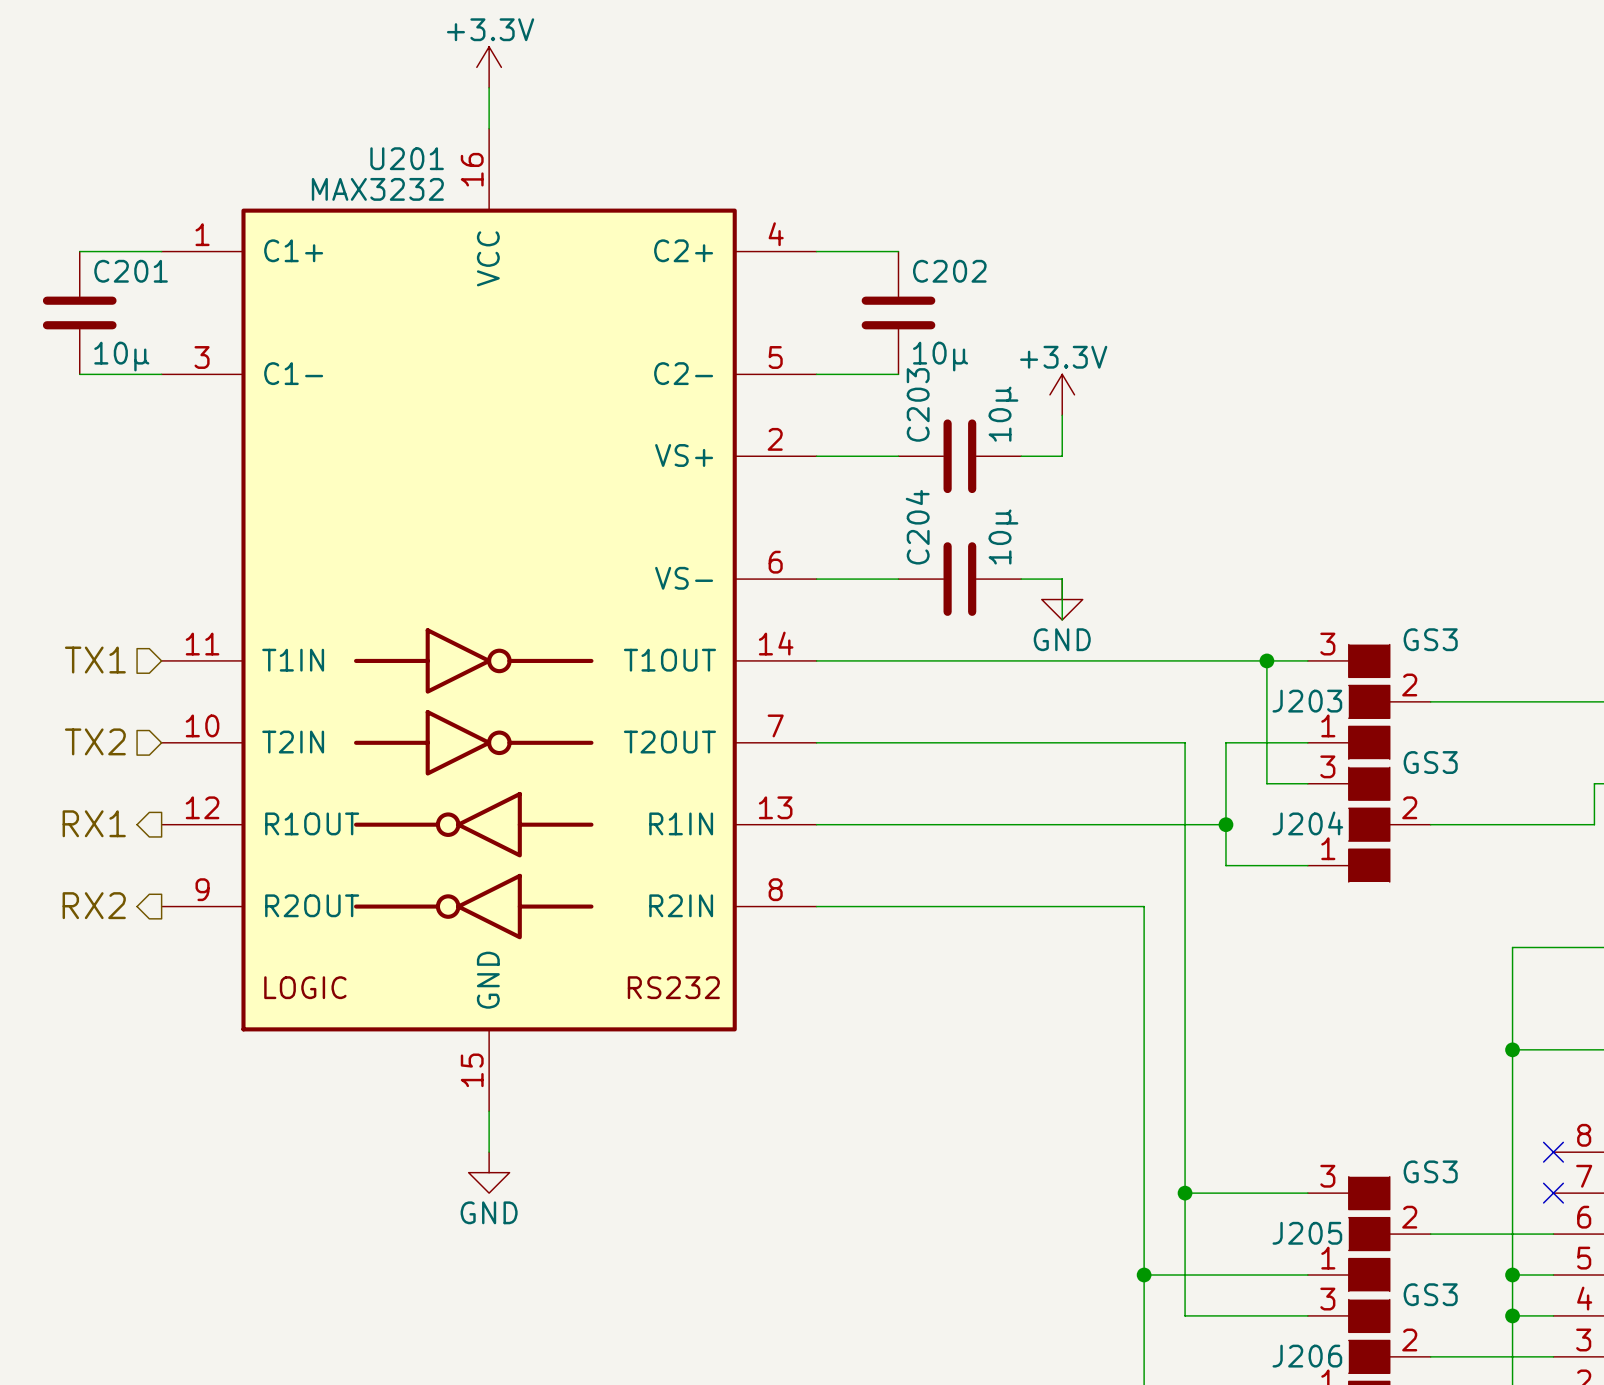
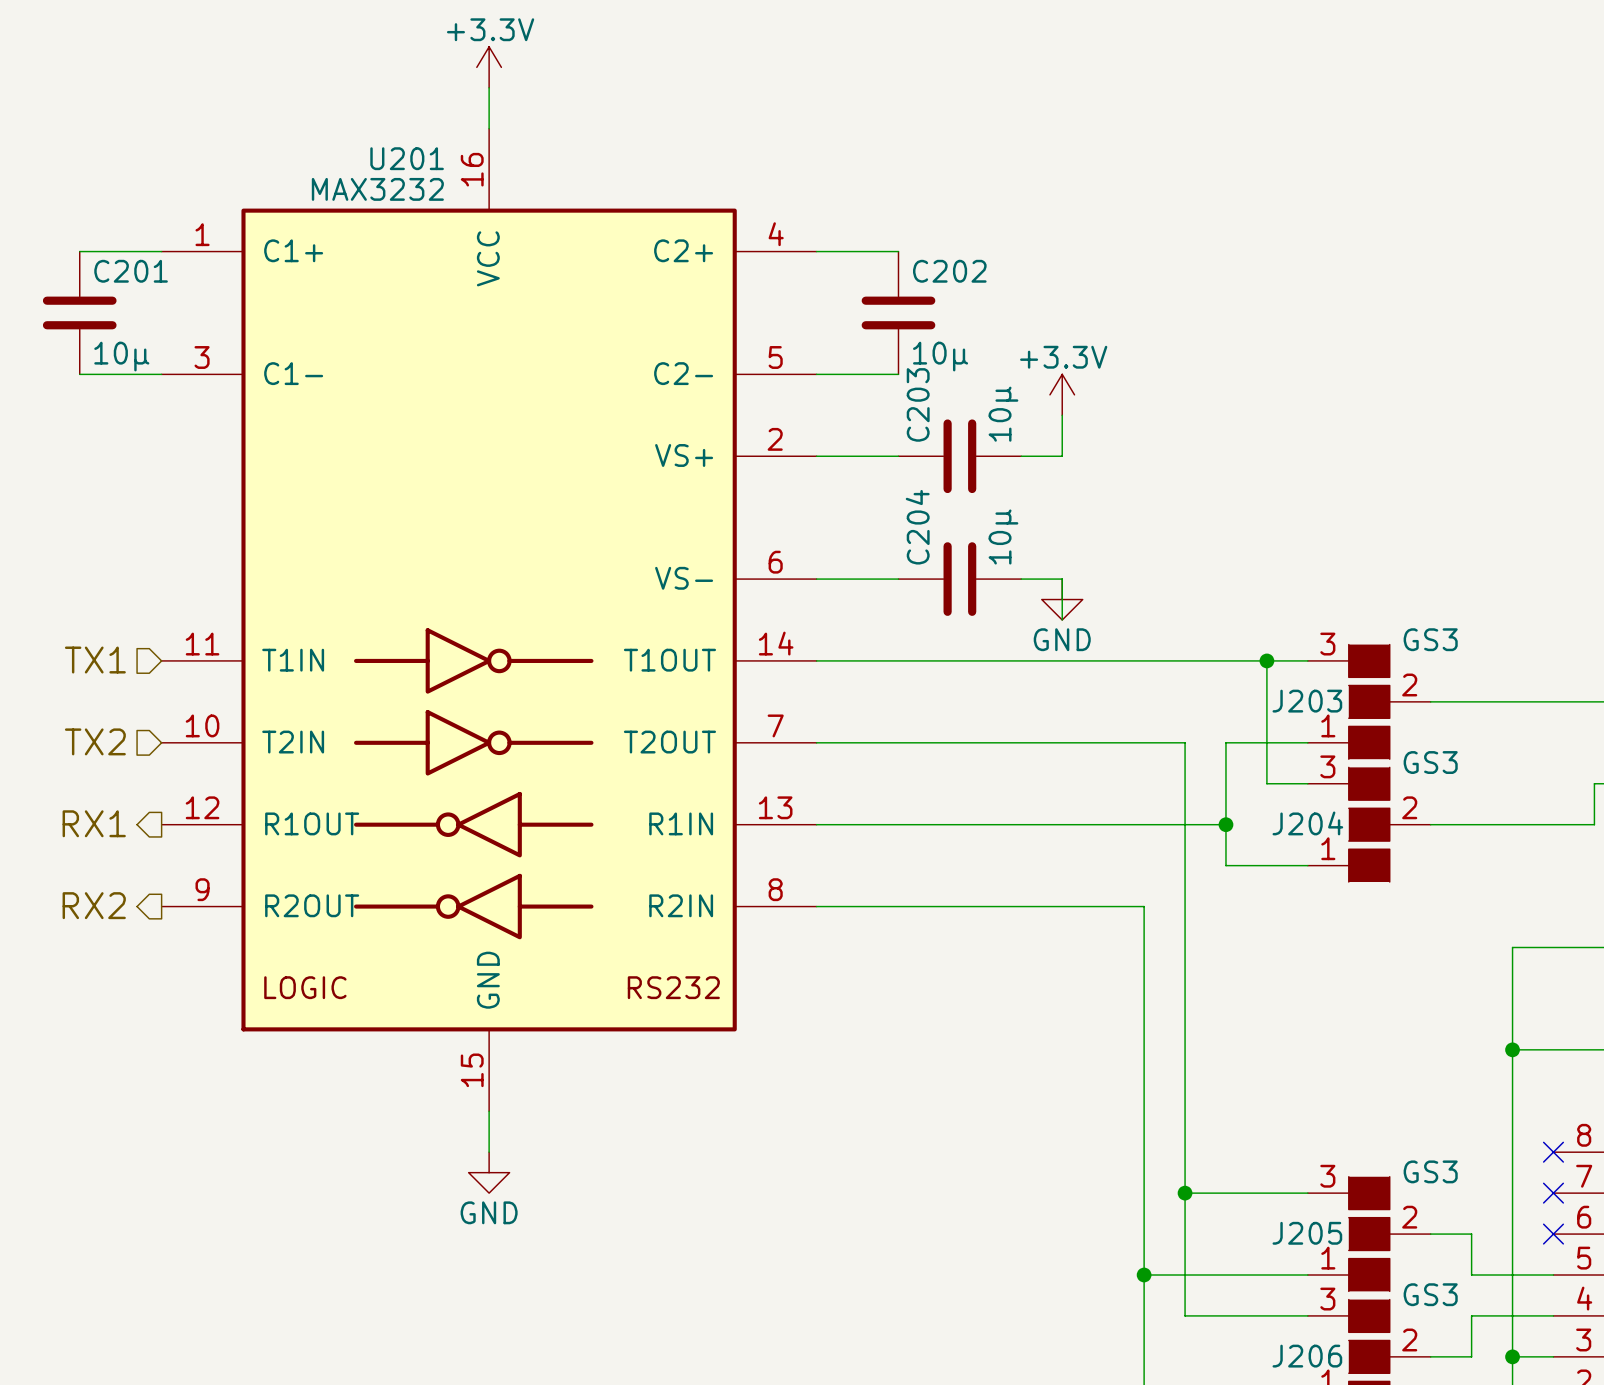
wire: (1471, 1234) (1553, 1234) -> (1471, 1234) (1471, 1275) (1512, 1275)
no-connect mark: none -> (1553, 1234)
junction: (1512, 1275) -> none
junction: (1512, 1315) -> none
wire: (1471, 1356) (1512, 1356) -> (1471, 1356) (1471, 1315) (1512, 1315)
junction: none -> (1512, 1356)

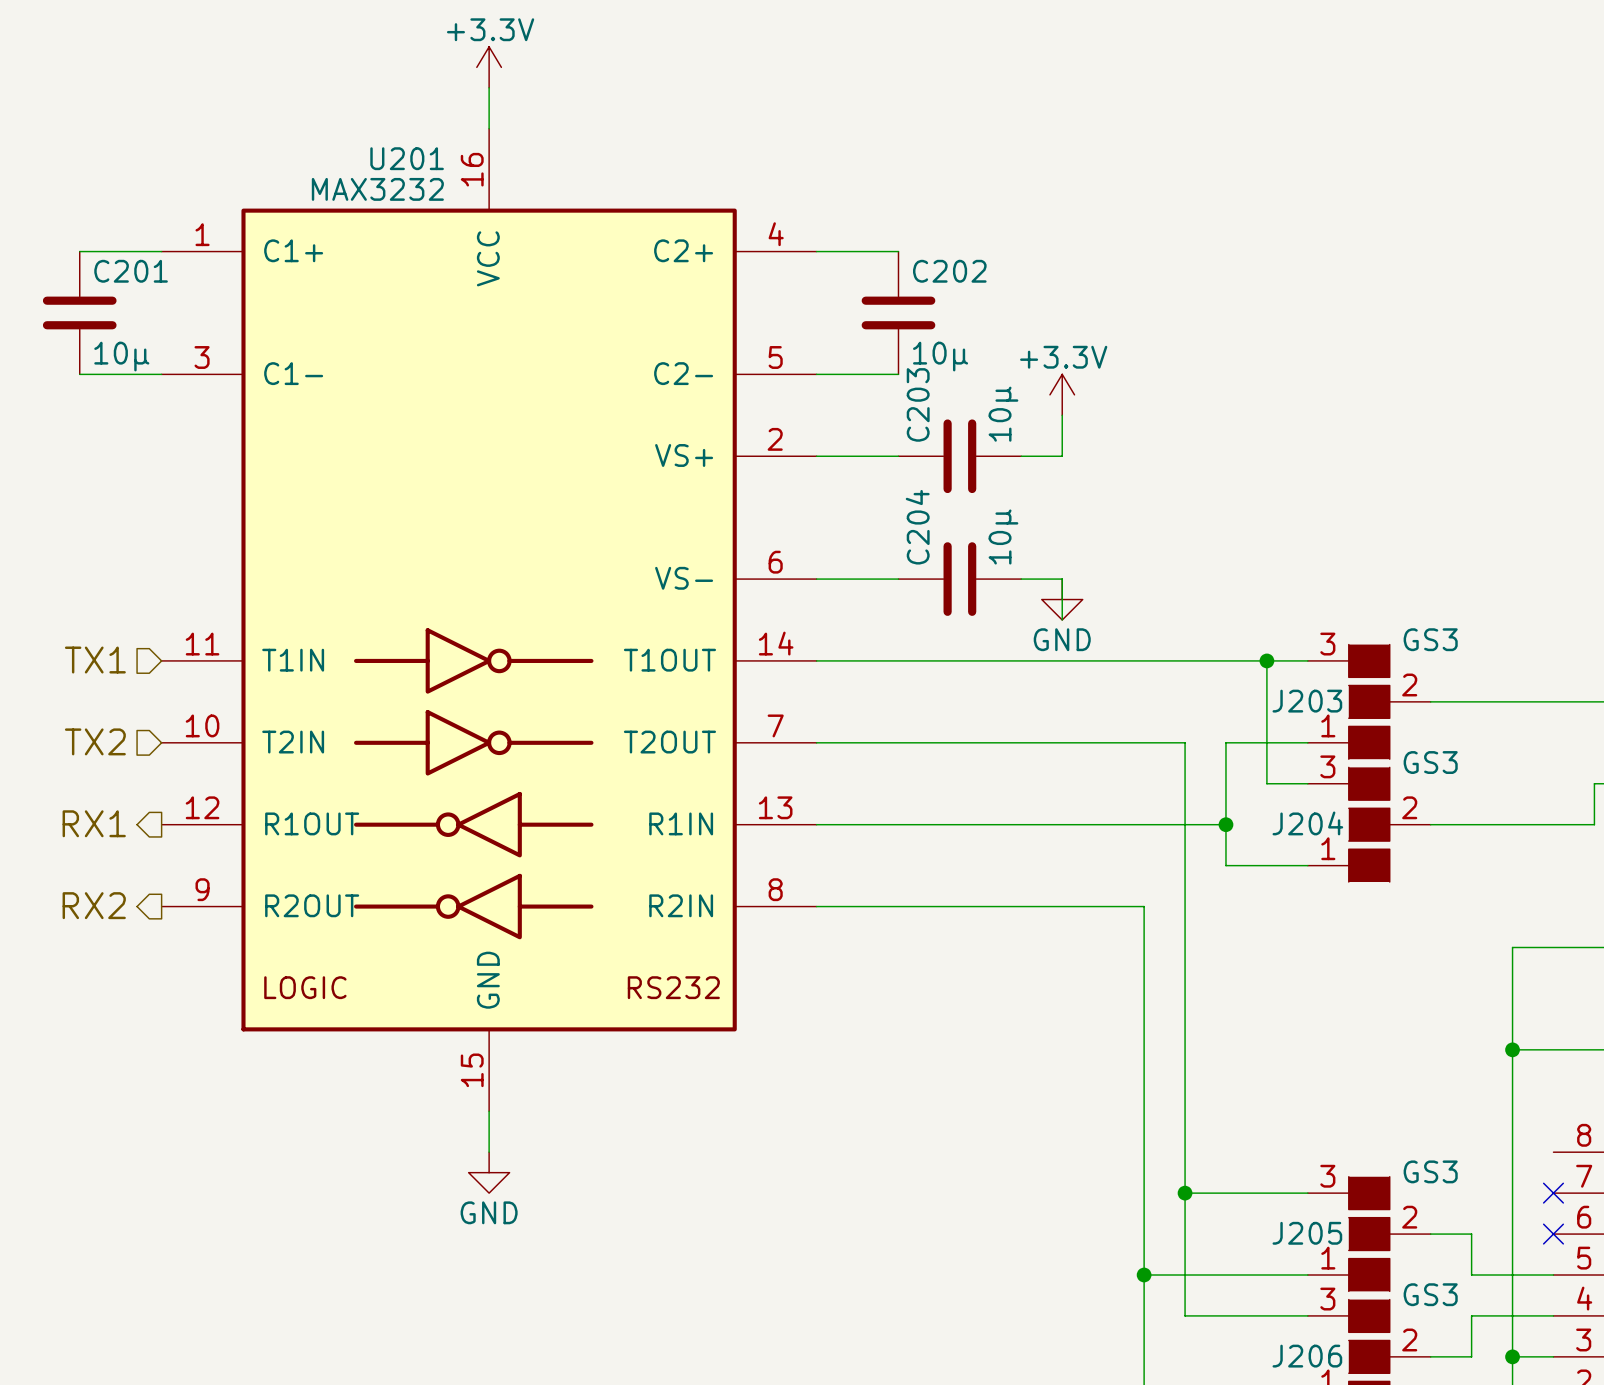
no-connect mark: (1553, 1152) -> none

